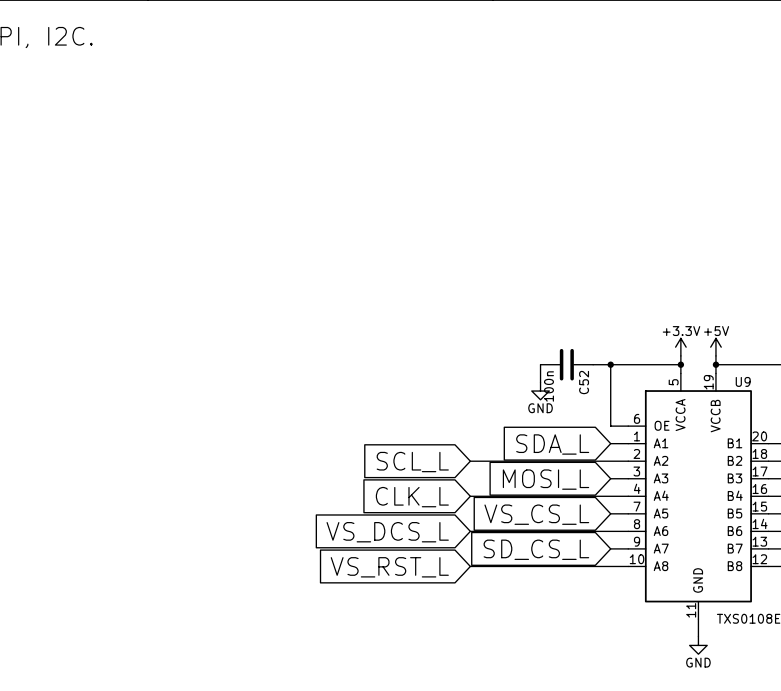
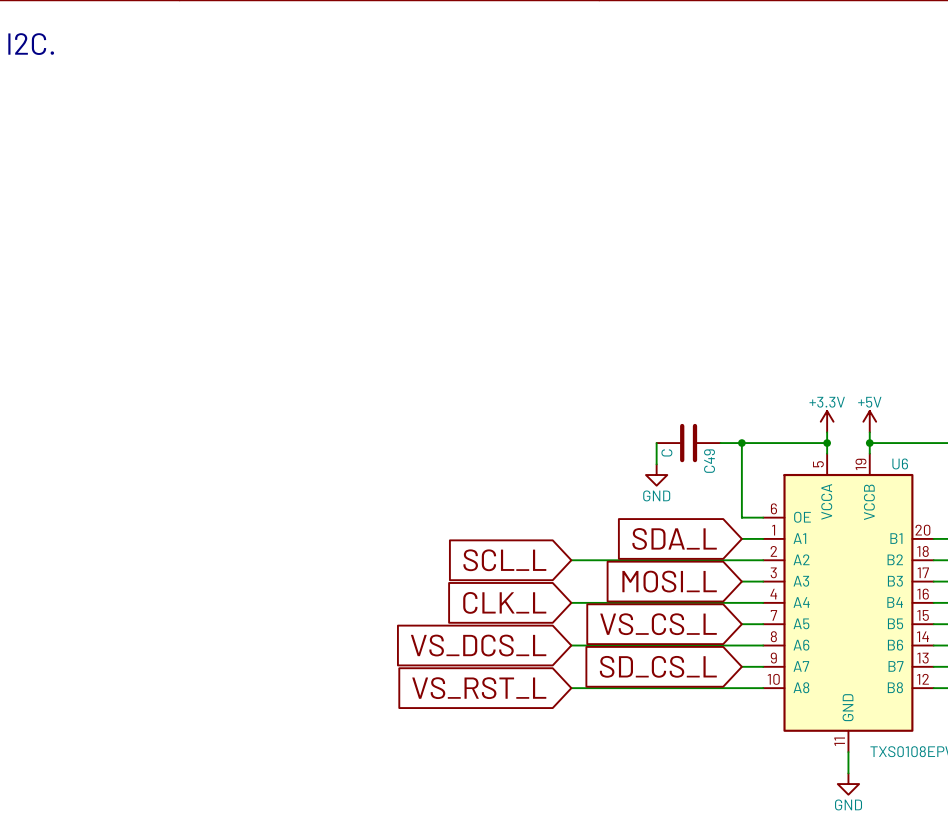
U9 name: U9 (743, 381) -> U6 (900, 463)
C52 name: C52 (584, 382) -> C49 (709, 461)
C52 value: 100n (548, 386) -> C (666, 452)

